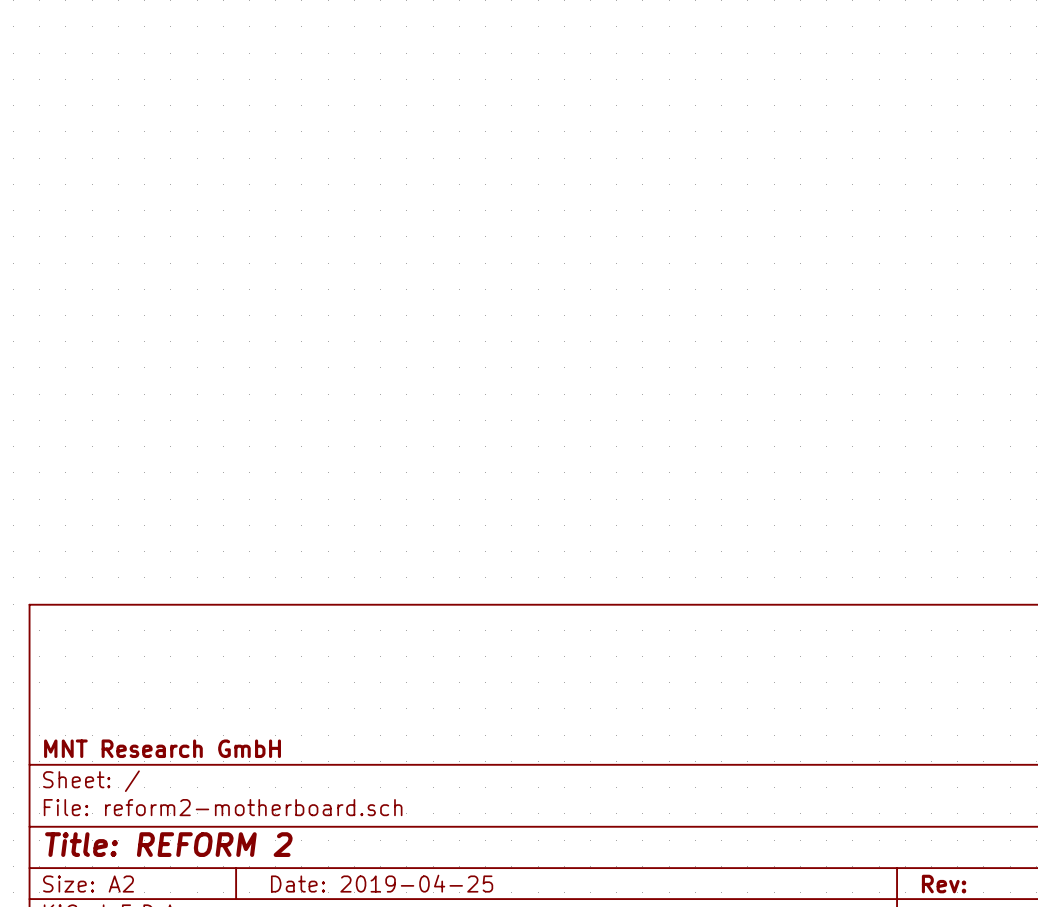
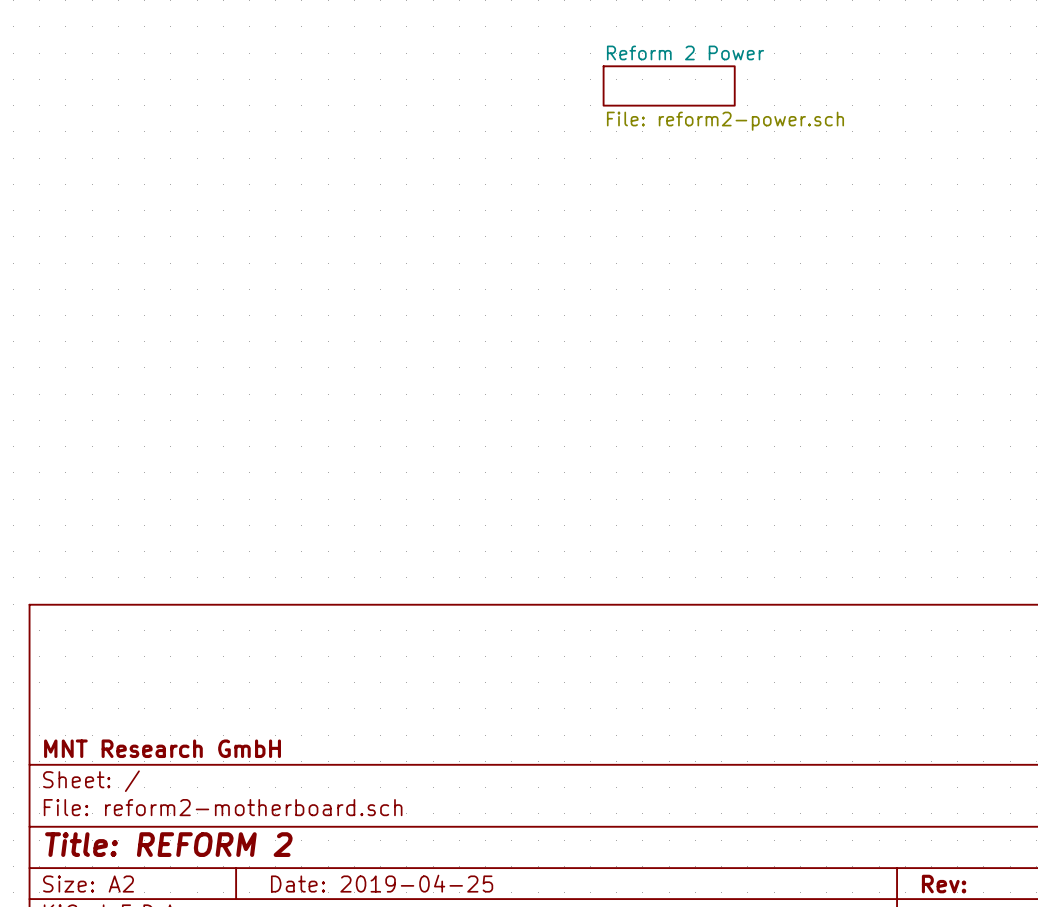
sheet Reform 2 Power: none -> File: reform2-power.sch (669, 85)

